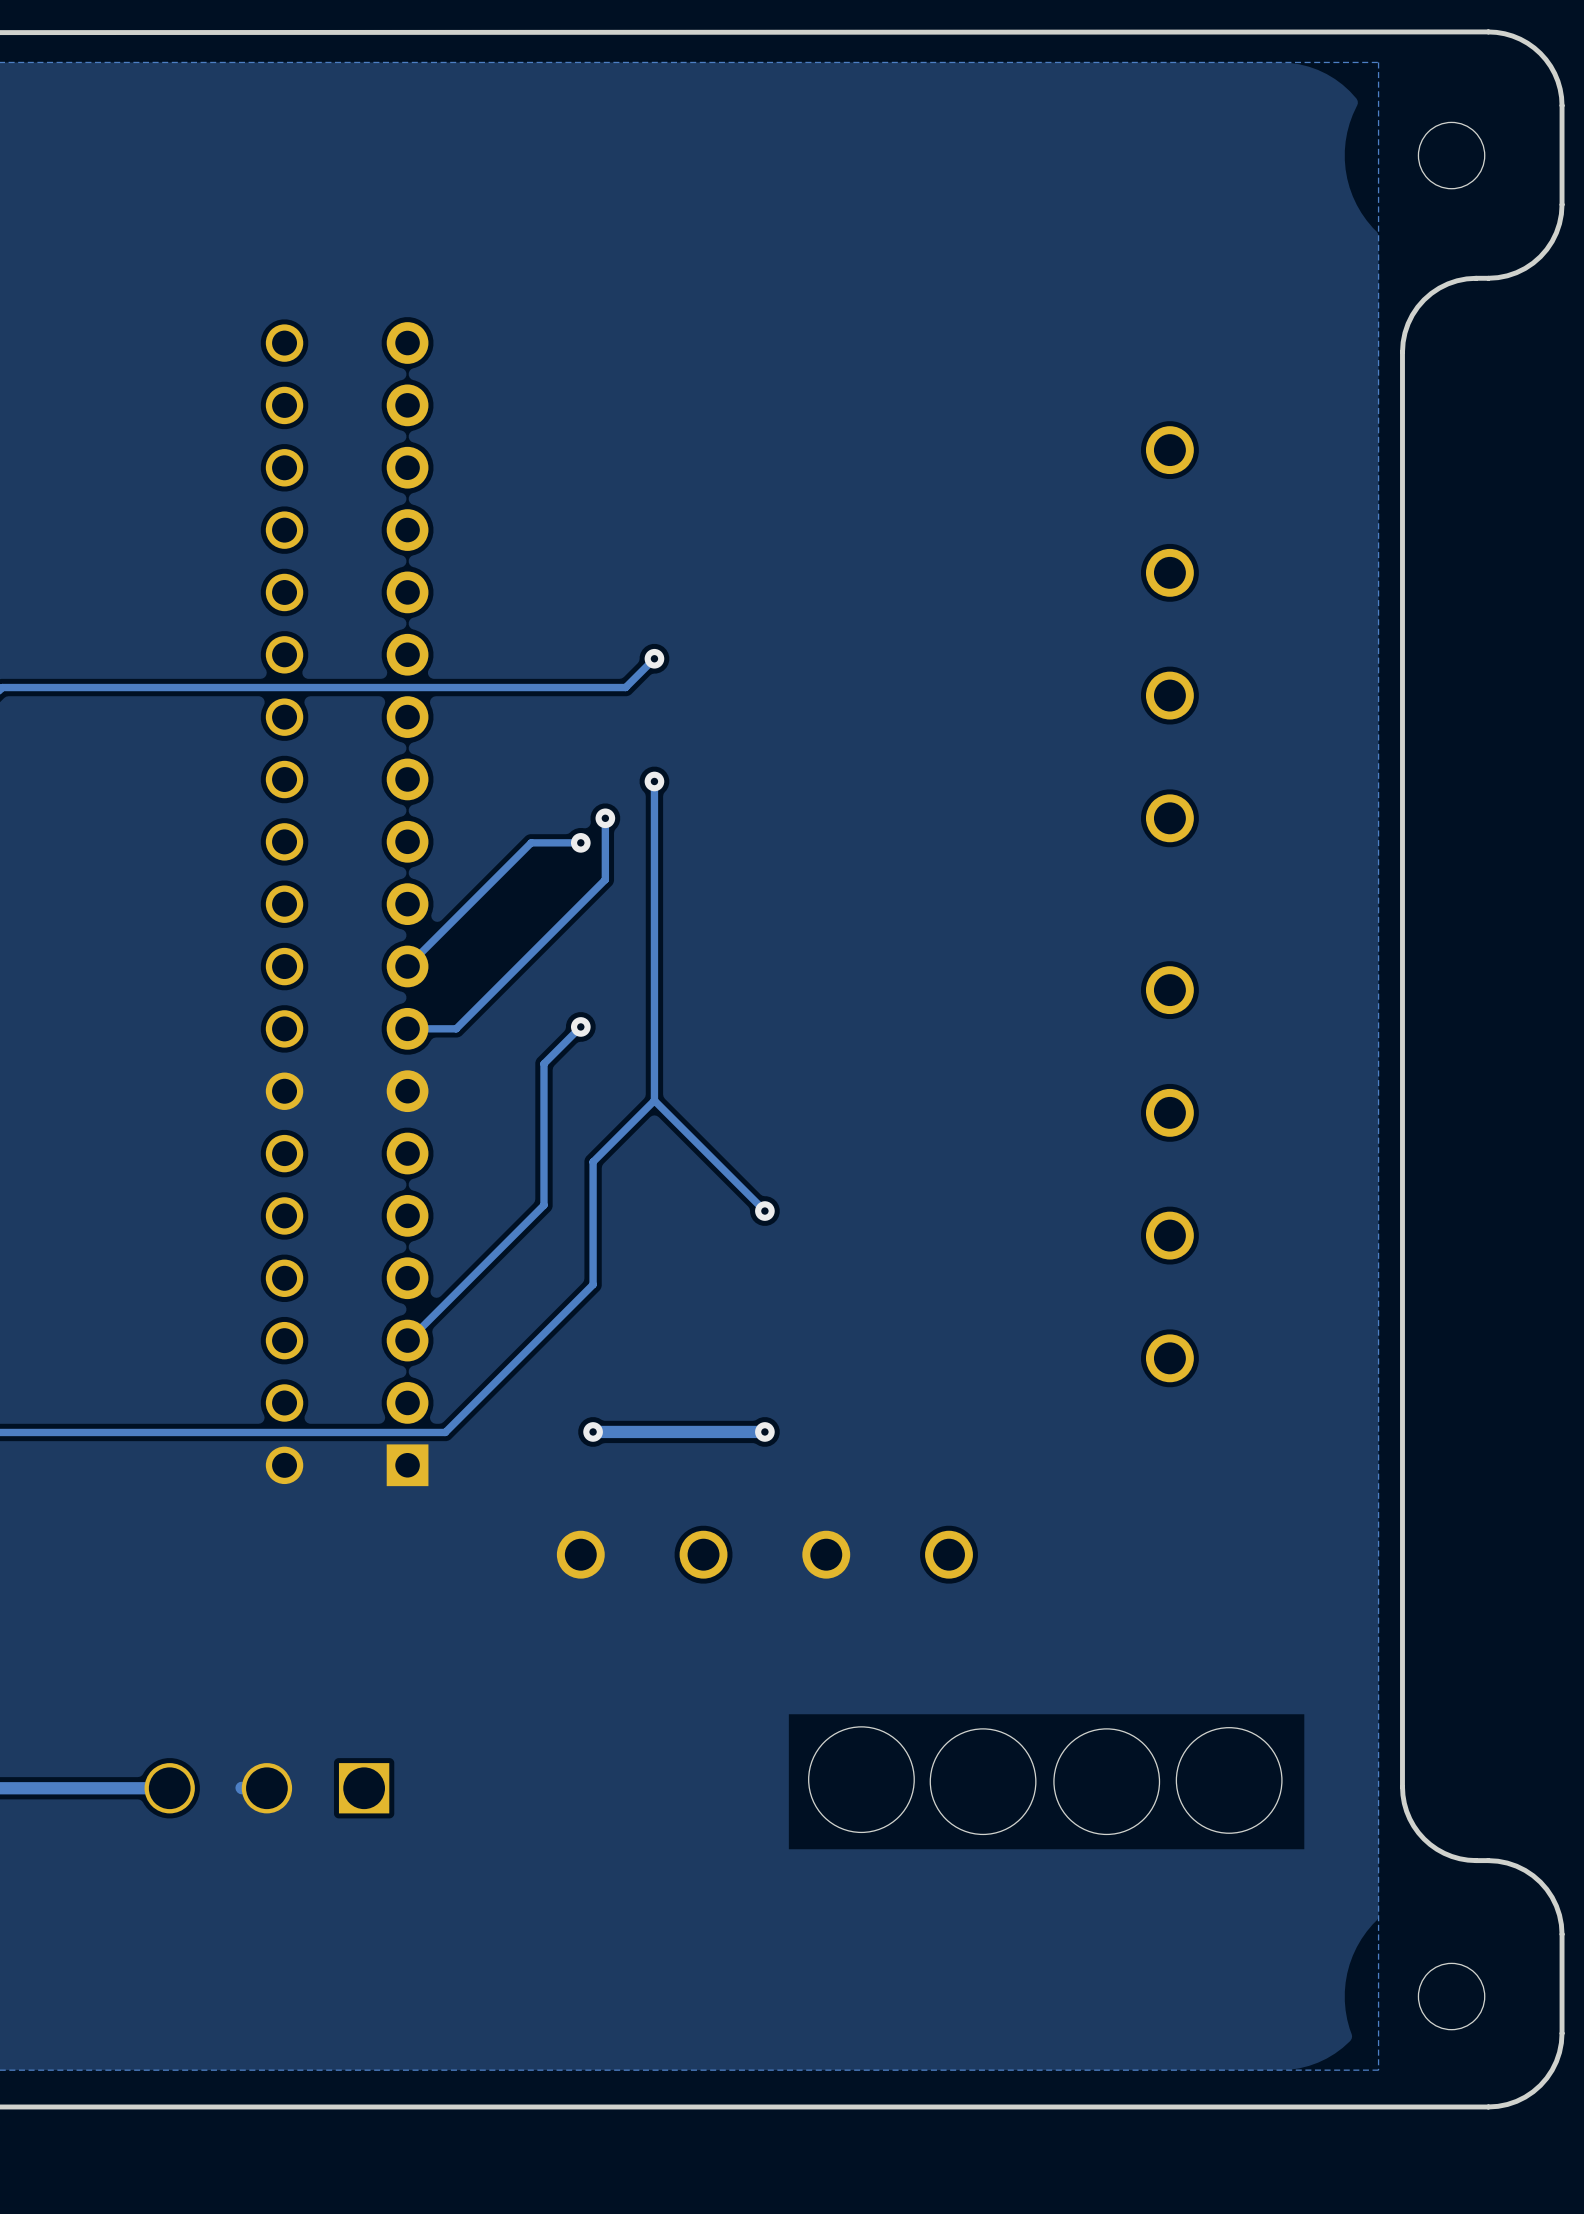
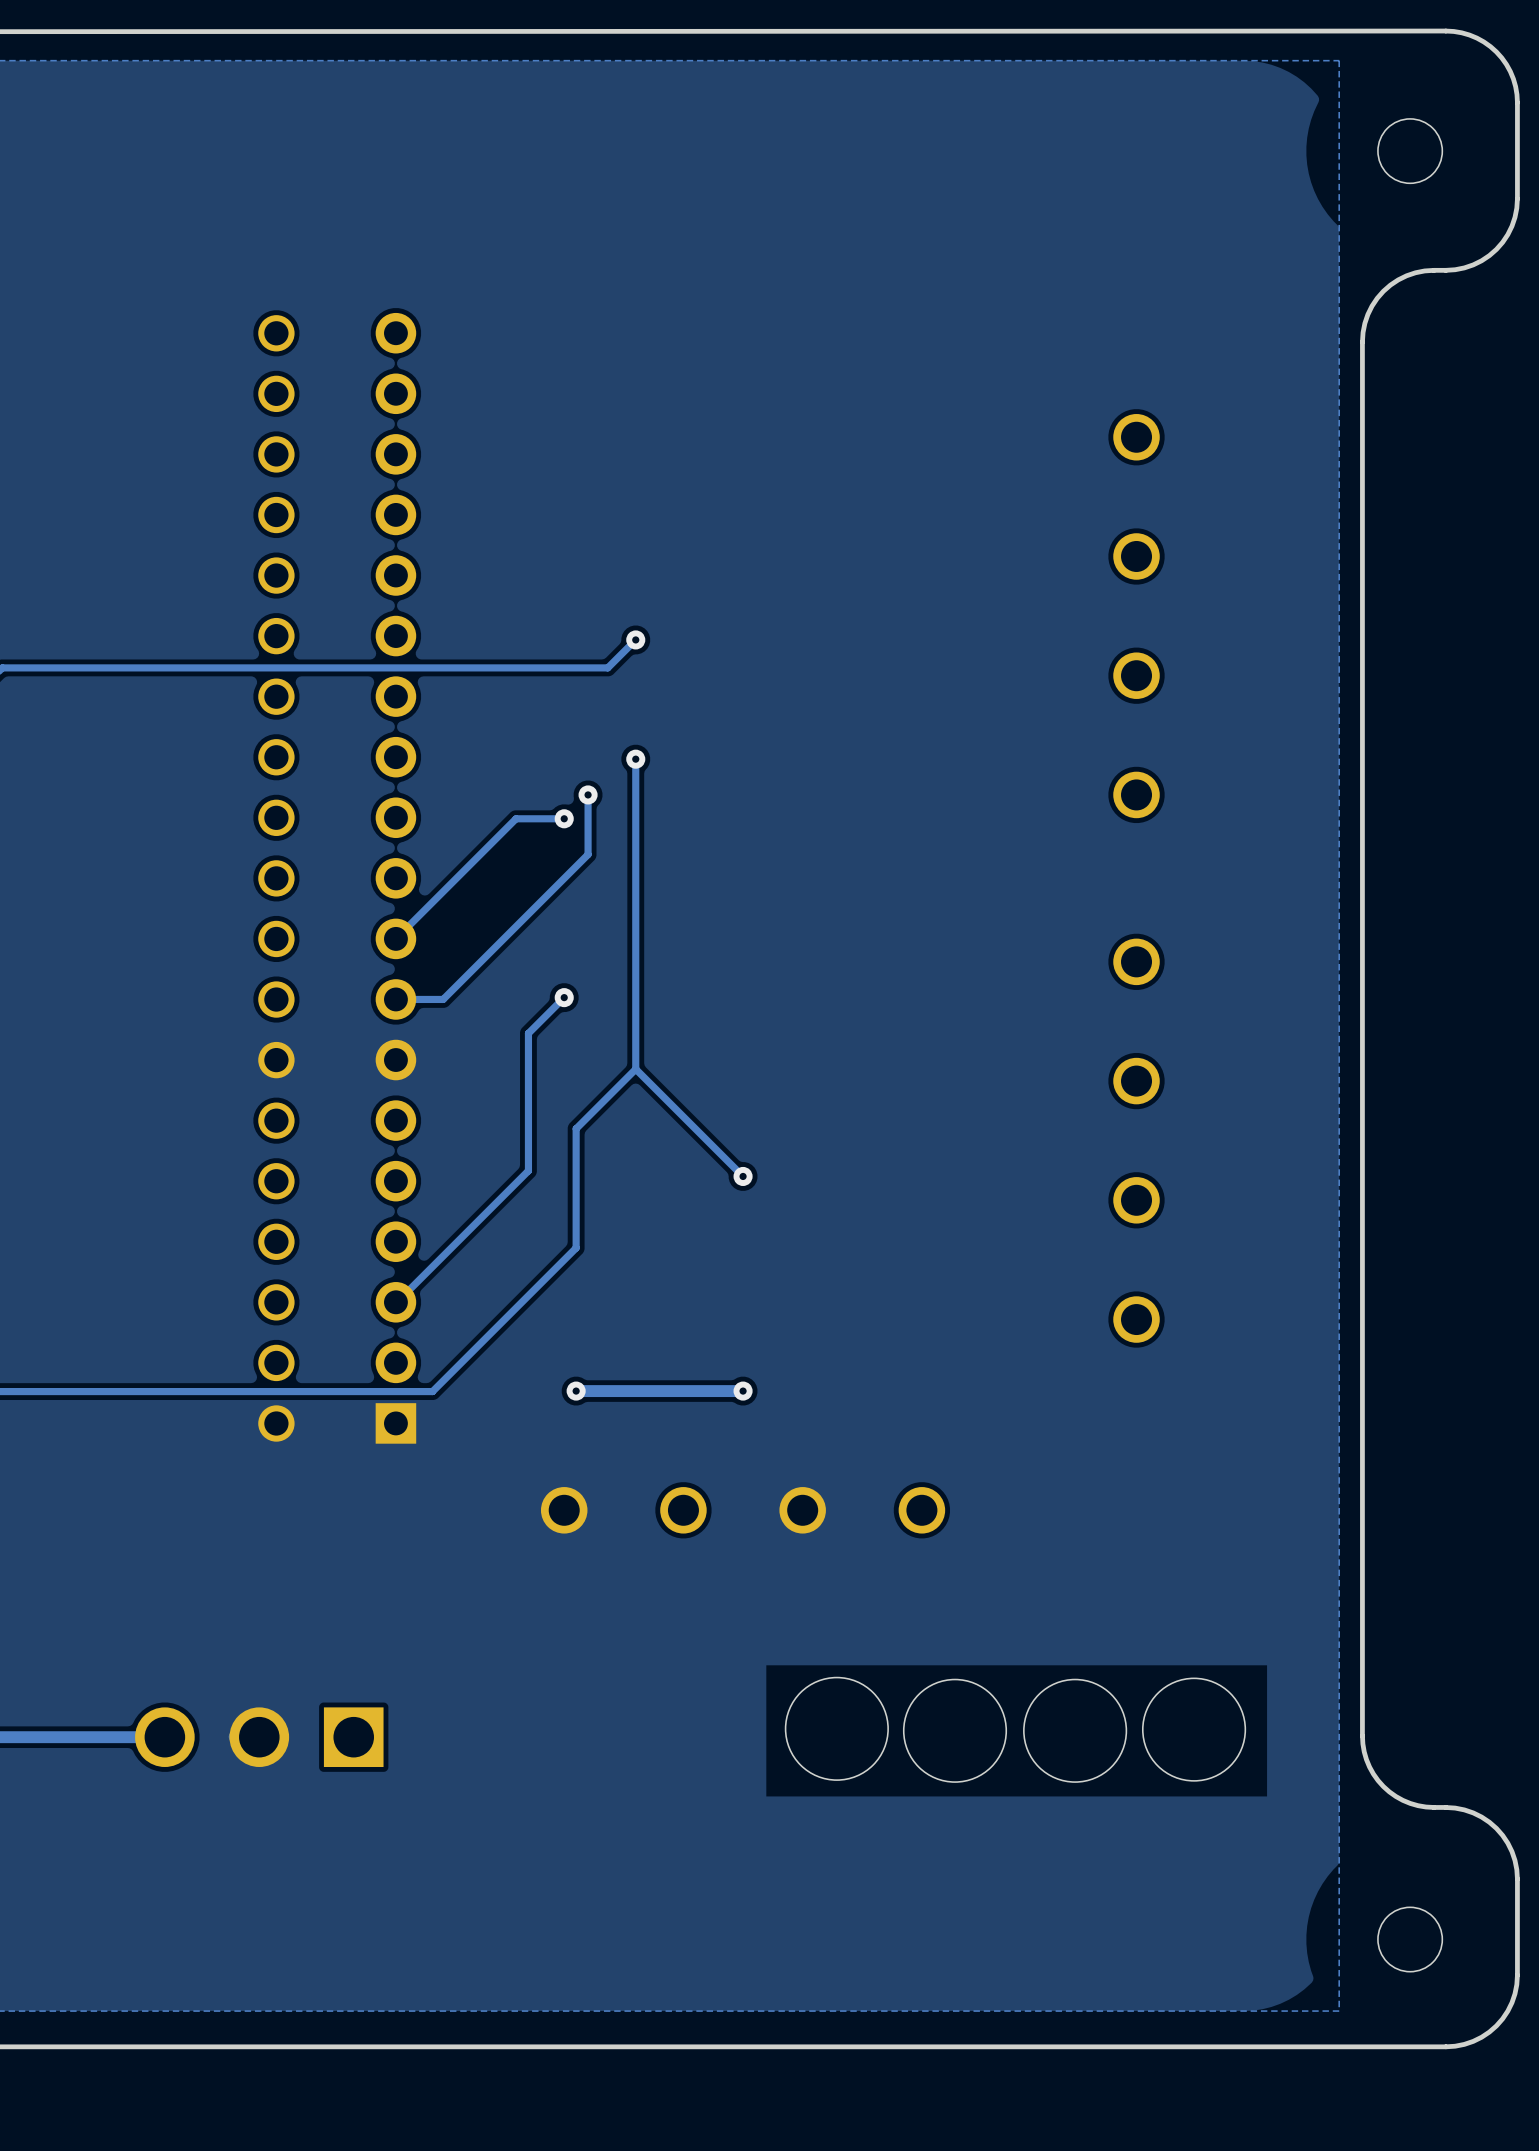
part footprint: [144, 1763, 390, 1814] -> [135, 1707, 384, 1767]

